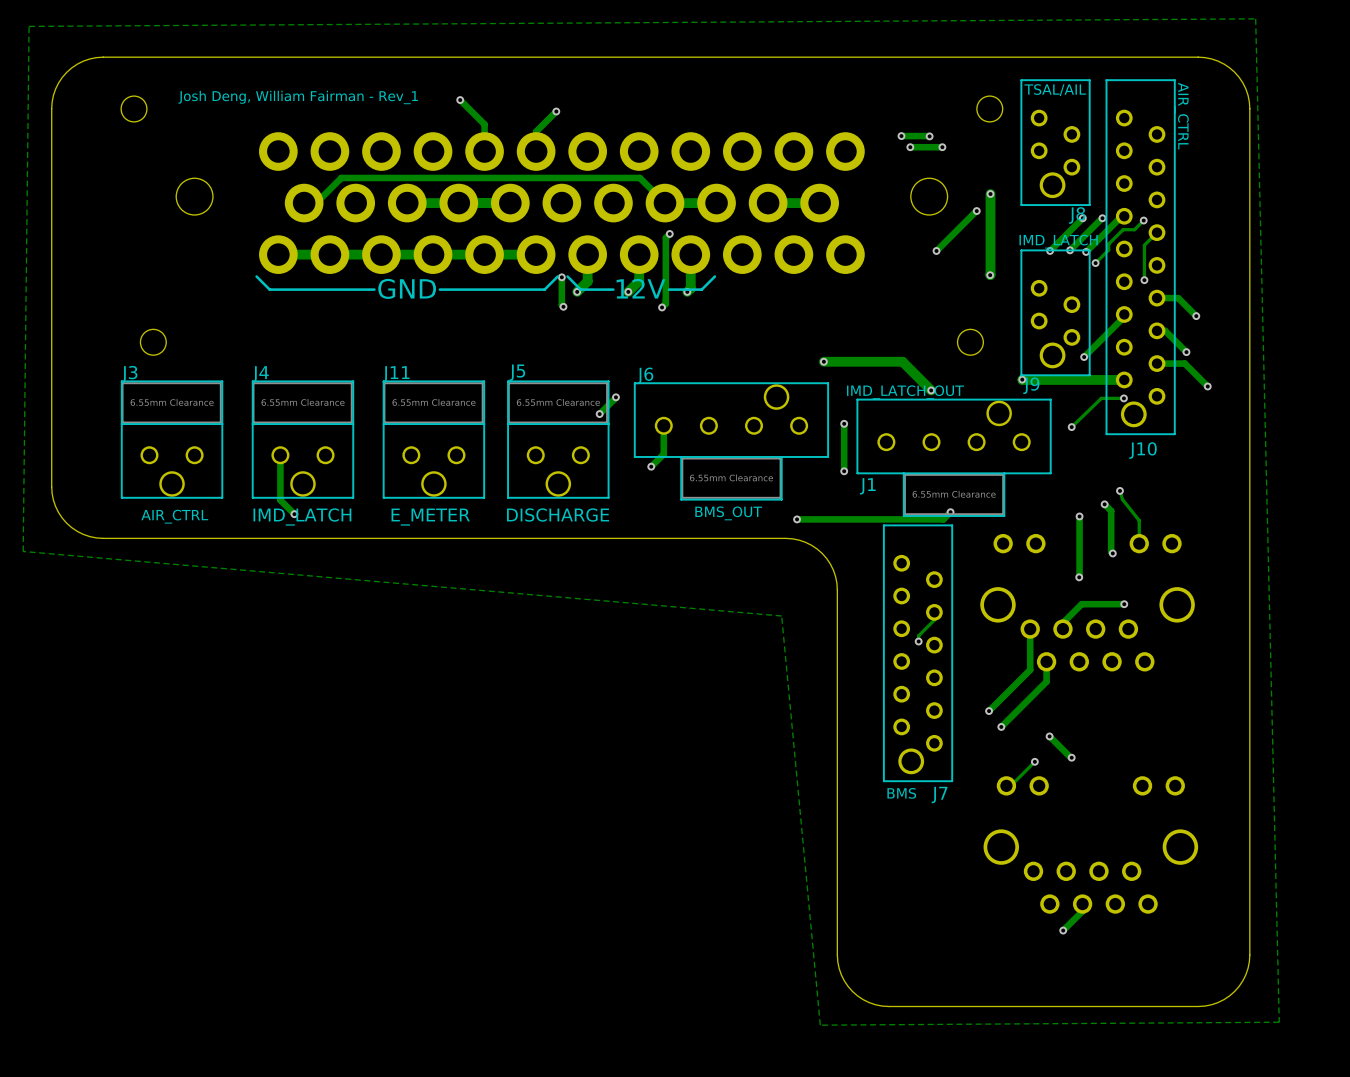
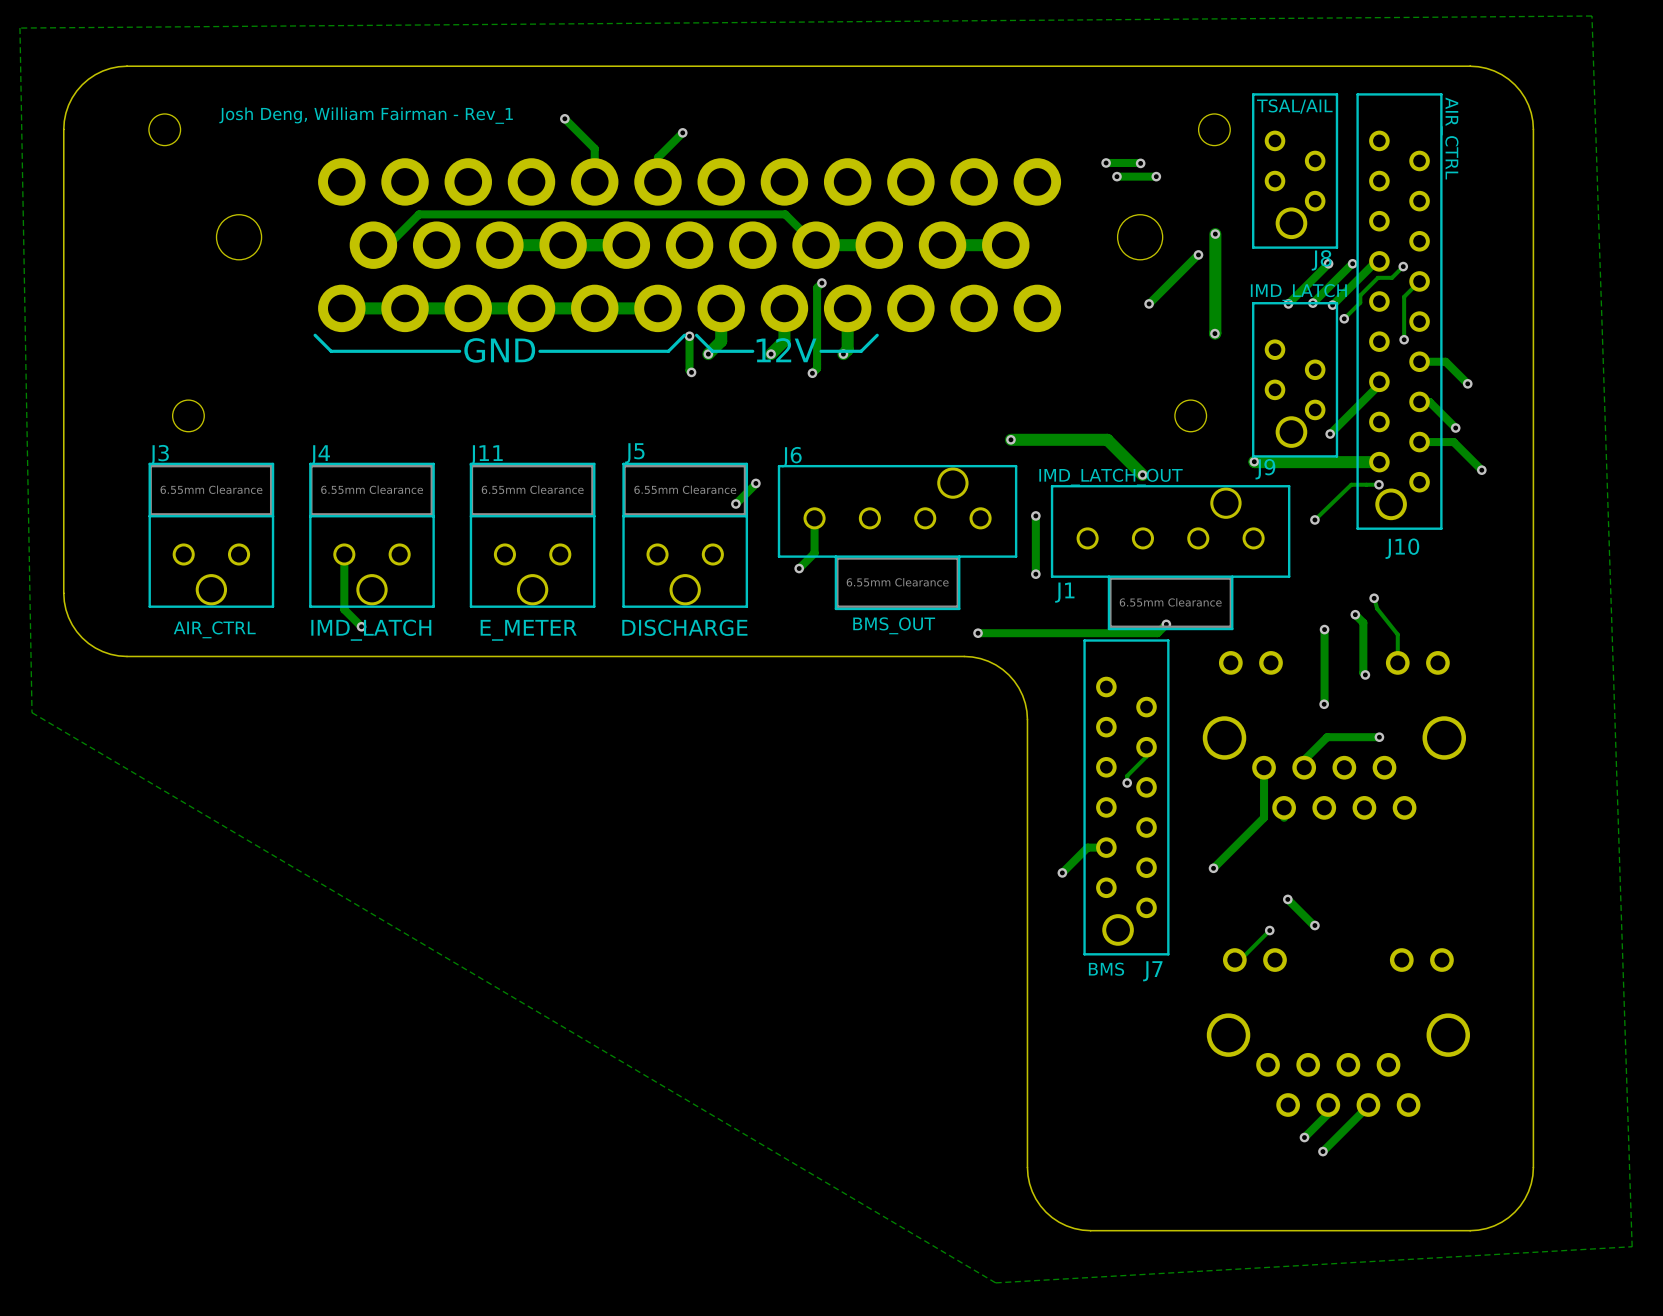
zone outline: (1255, 18) (1279, 1022) (820, 1025) (781, 615) (23, 551) (29, 26) (1255, 18) -> (1591, 16) (1632, 1246) (995, 1282) (32, 712) (19, 28) (1591, 16)
track: (1046, 669) (1046, 681) (1001, 726) -> none
track: none -> (1106, 847) (1087, 847) (1062, 872)
via: none -> (1062, 872)
via: (1001, 726) -> none
track: none -> (1368, 1106) (1322, 1151)
via: none -> (1322, 1151)

